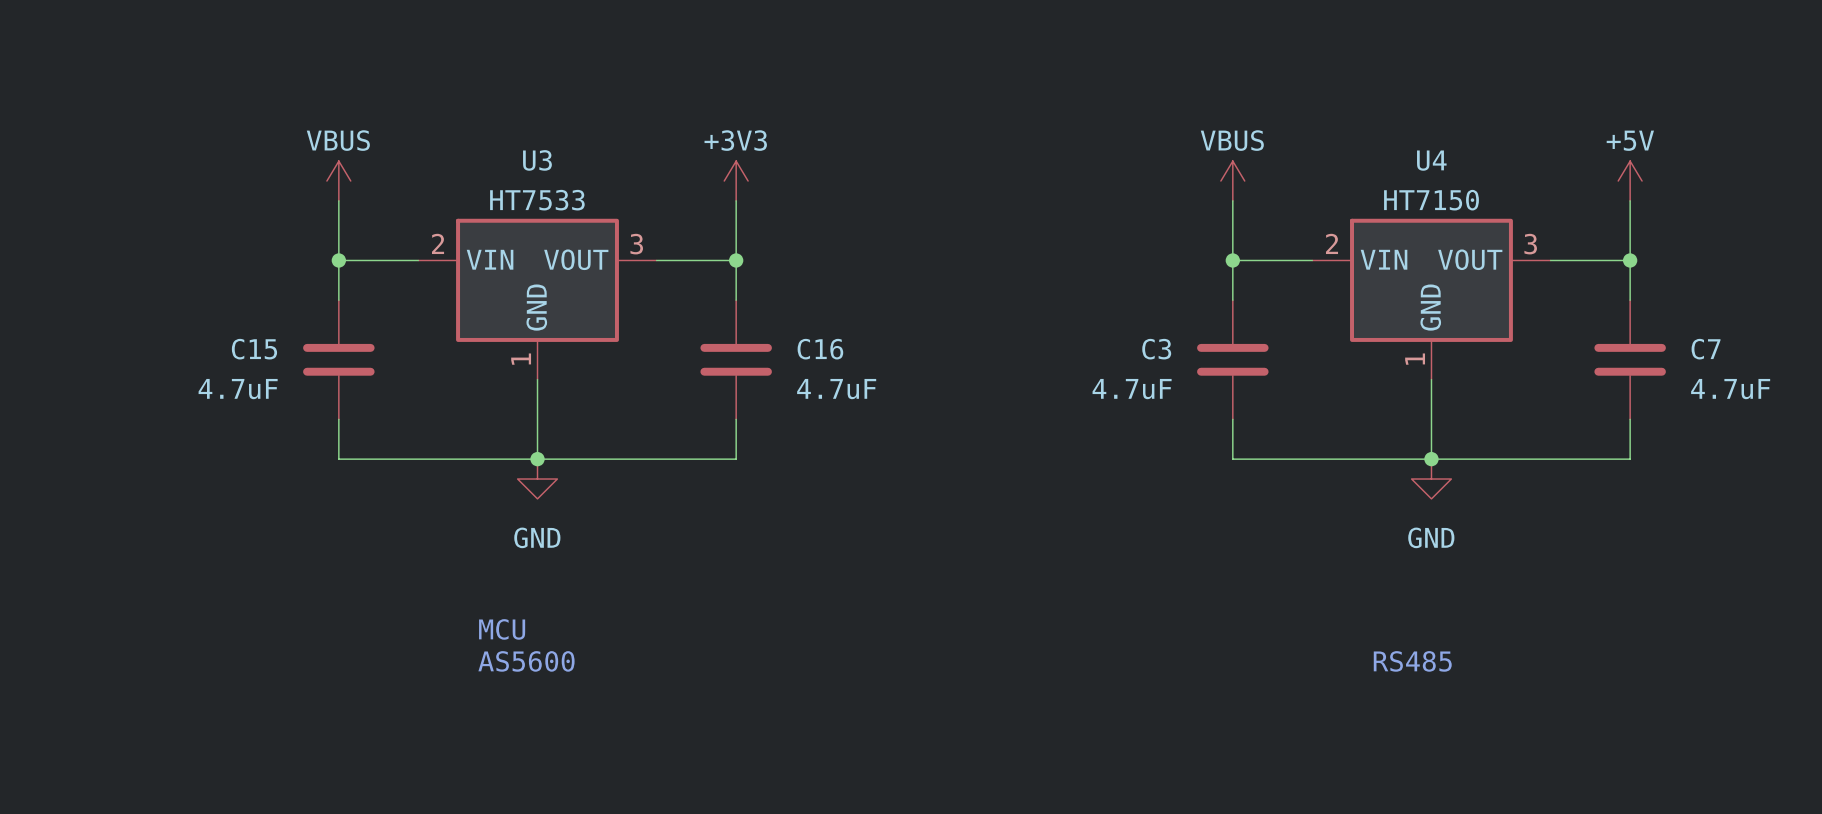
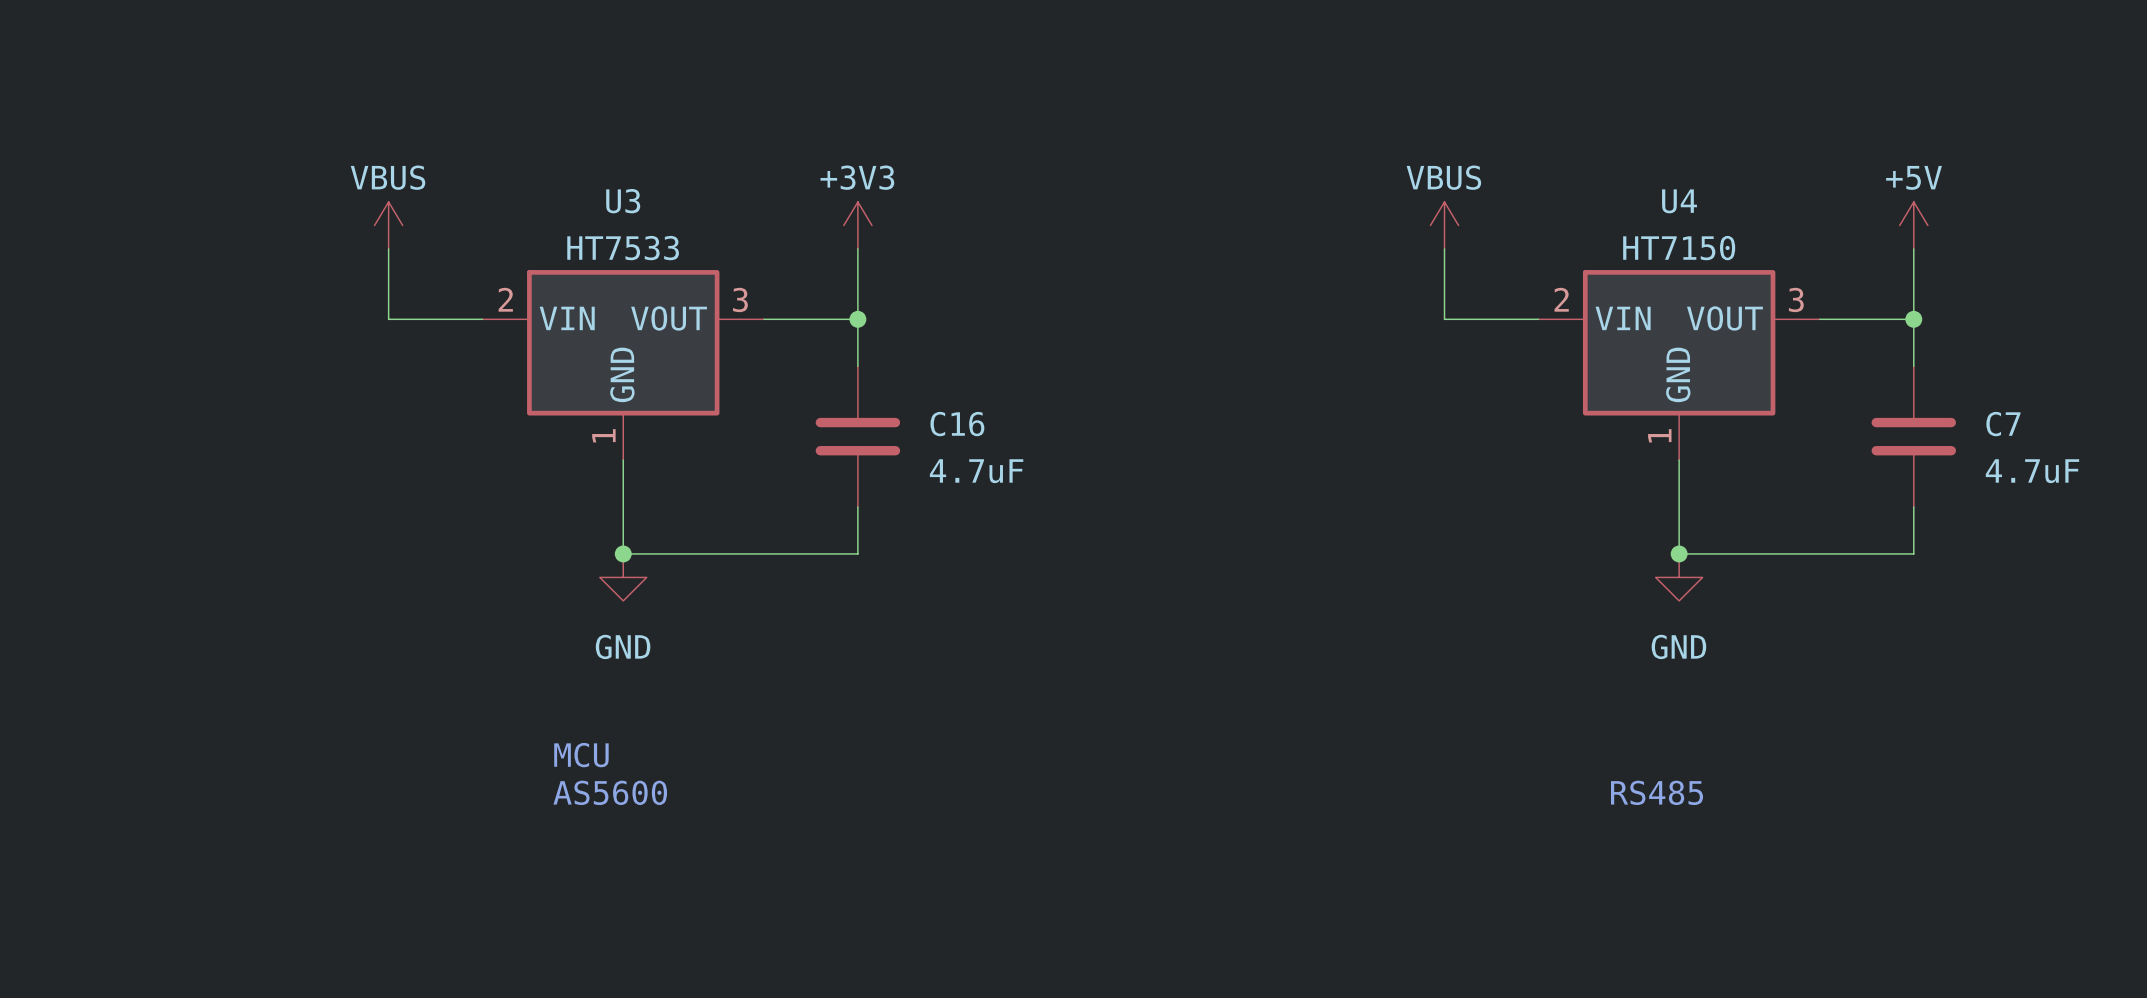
wire: (338, 260) (338, 300) -> none
junction: (338, 260) -> none
wire: (1232, 260) (1232, 300) -> none
junction: (1232, 260) -> none
C15: 4.7uF (338, 359) -> none
C3: 4.7uF (1232, 359) -> none
wire: (338, 419) (338, 459) (537, 459) -> none
wire: (1232, 419) (1232, 459) (1431, 459) -> none

